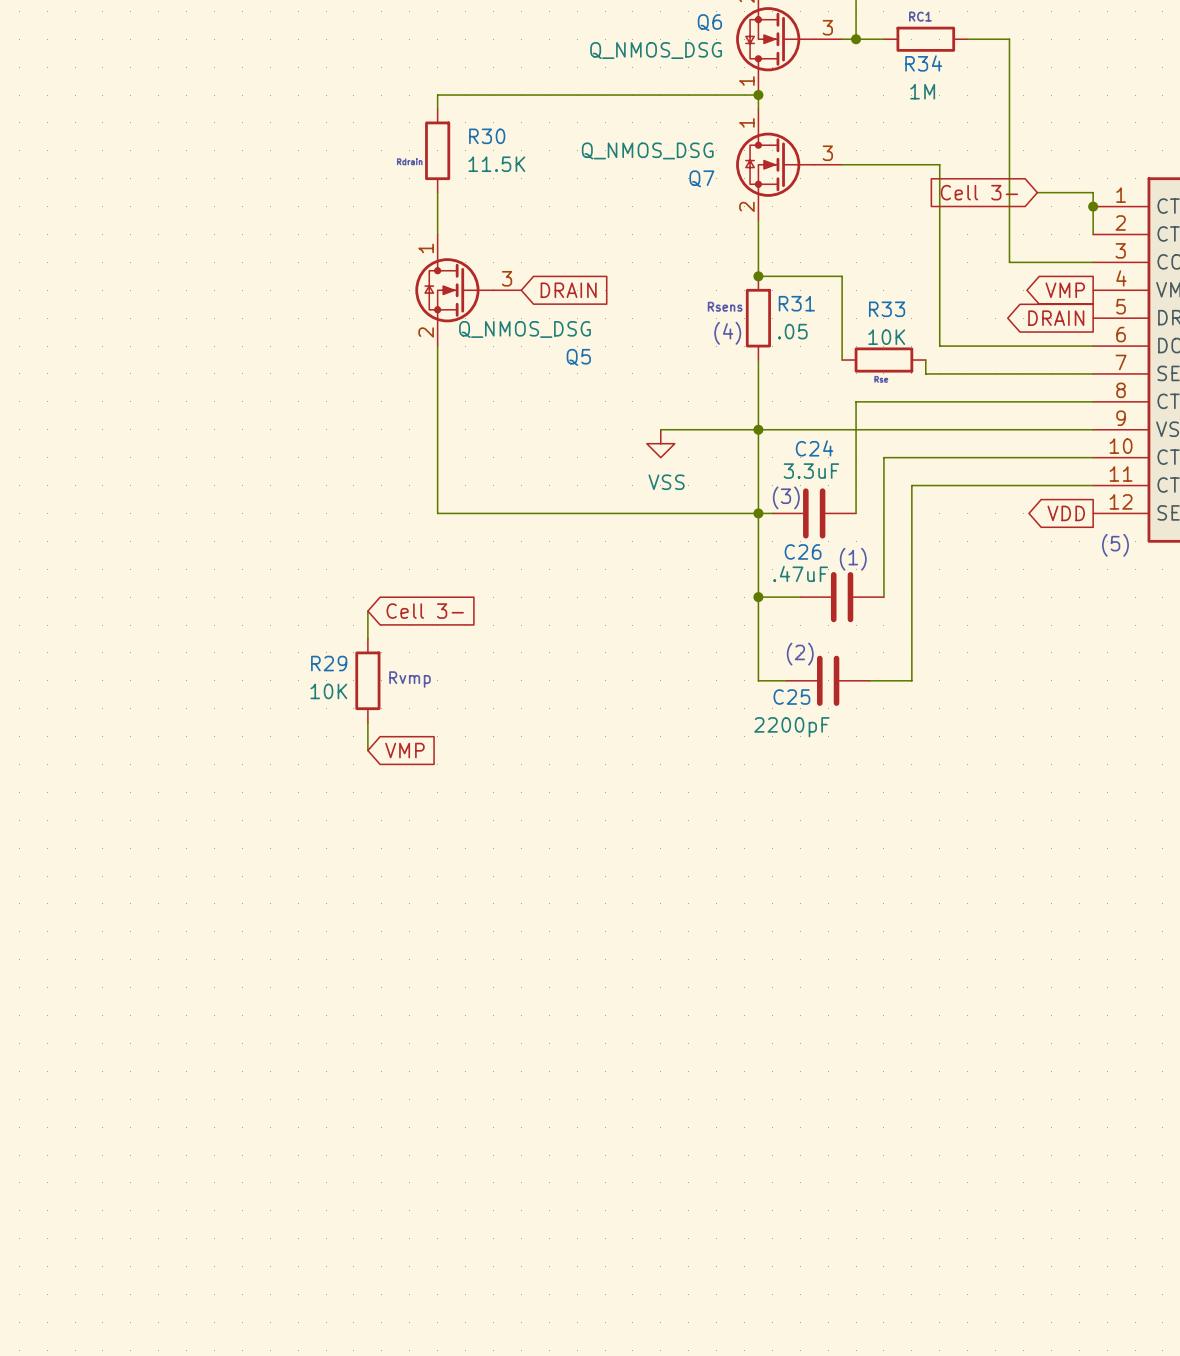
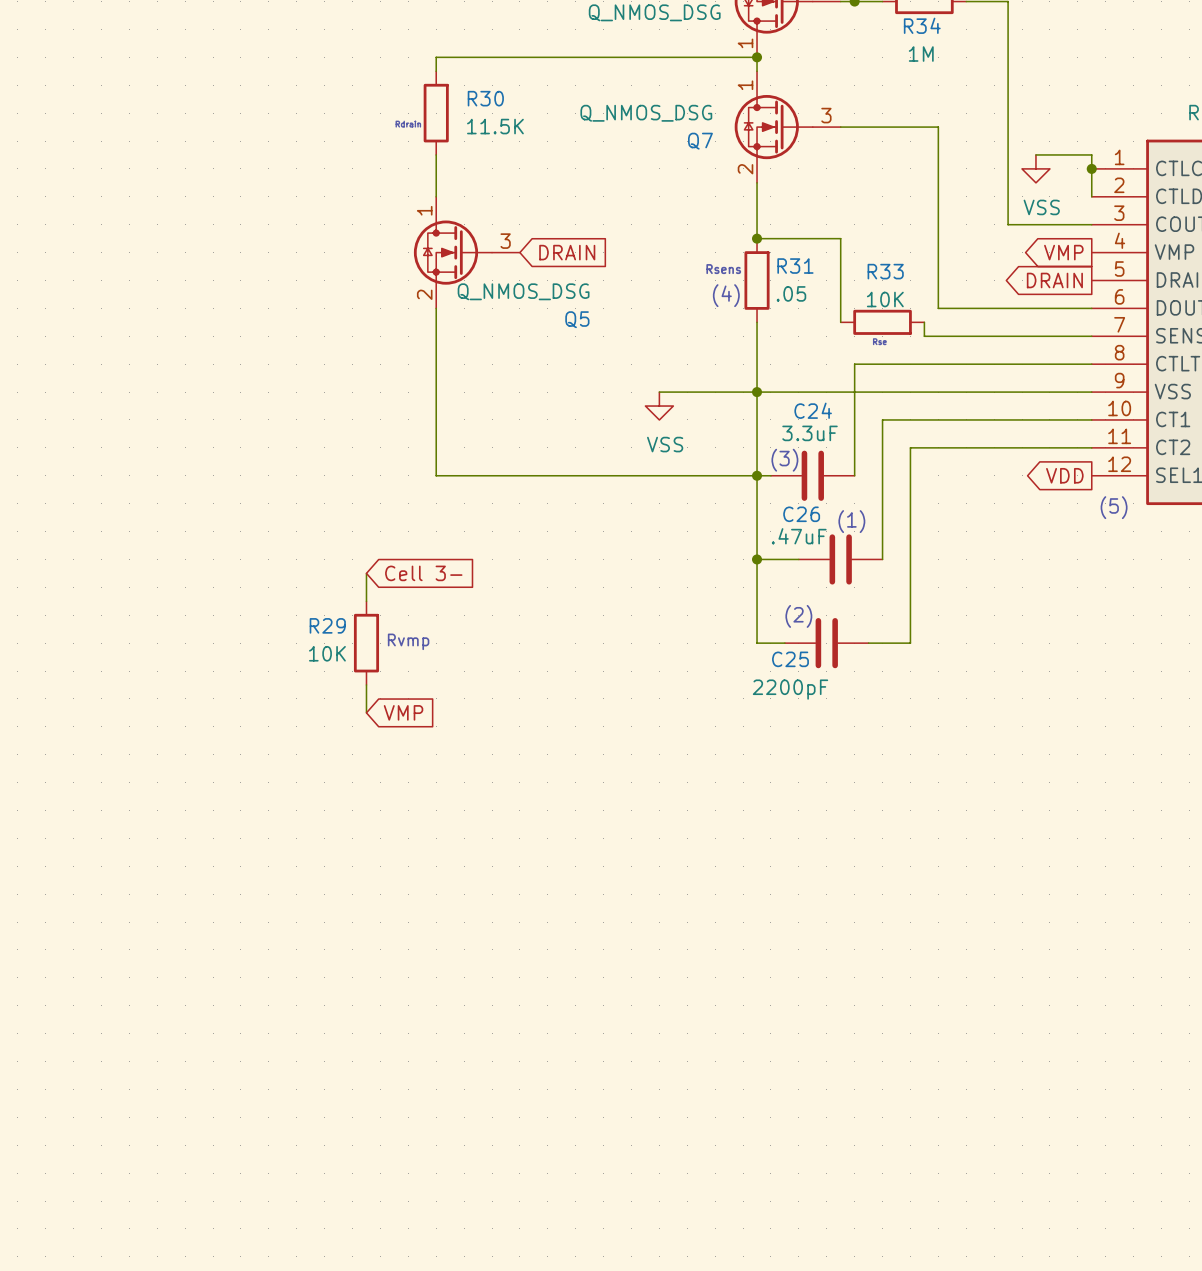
global label: Cell 3- (979, 192) -> none
power symbol: none -> VSS (1035, 168)

